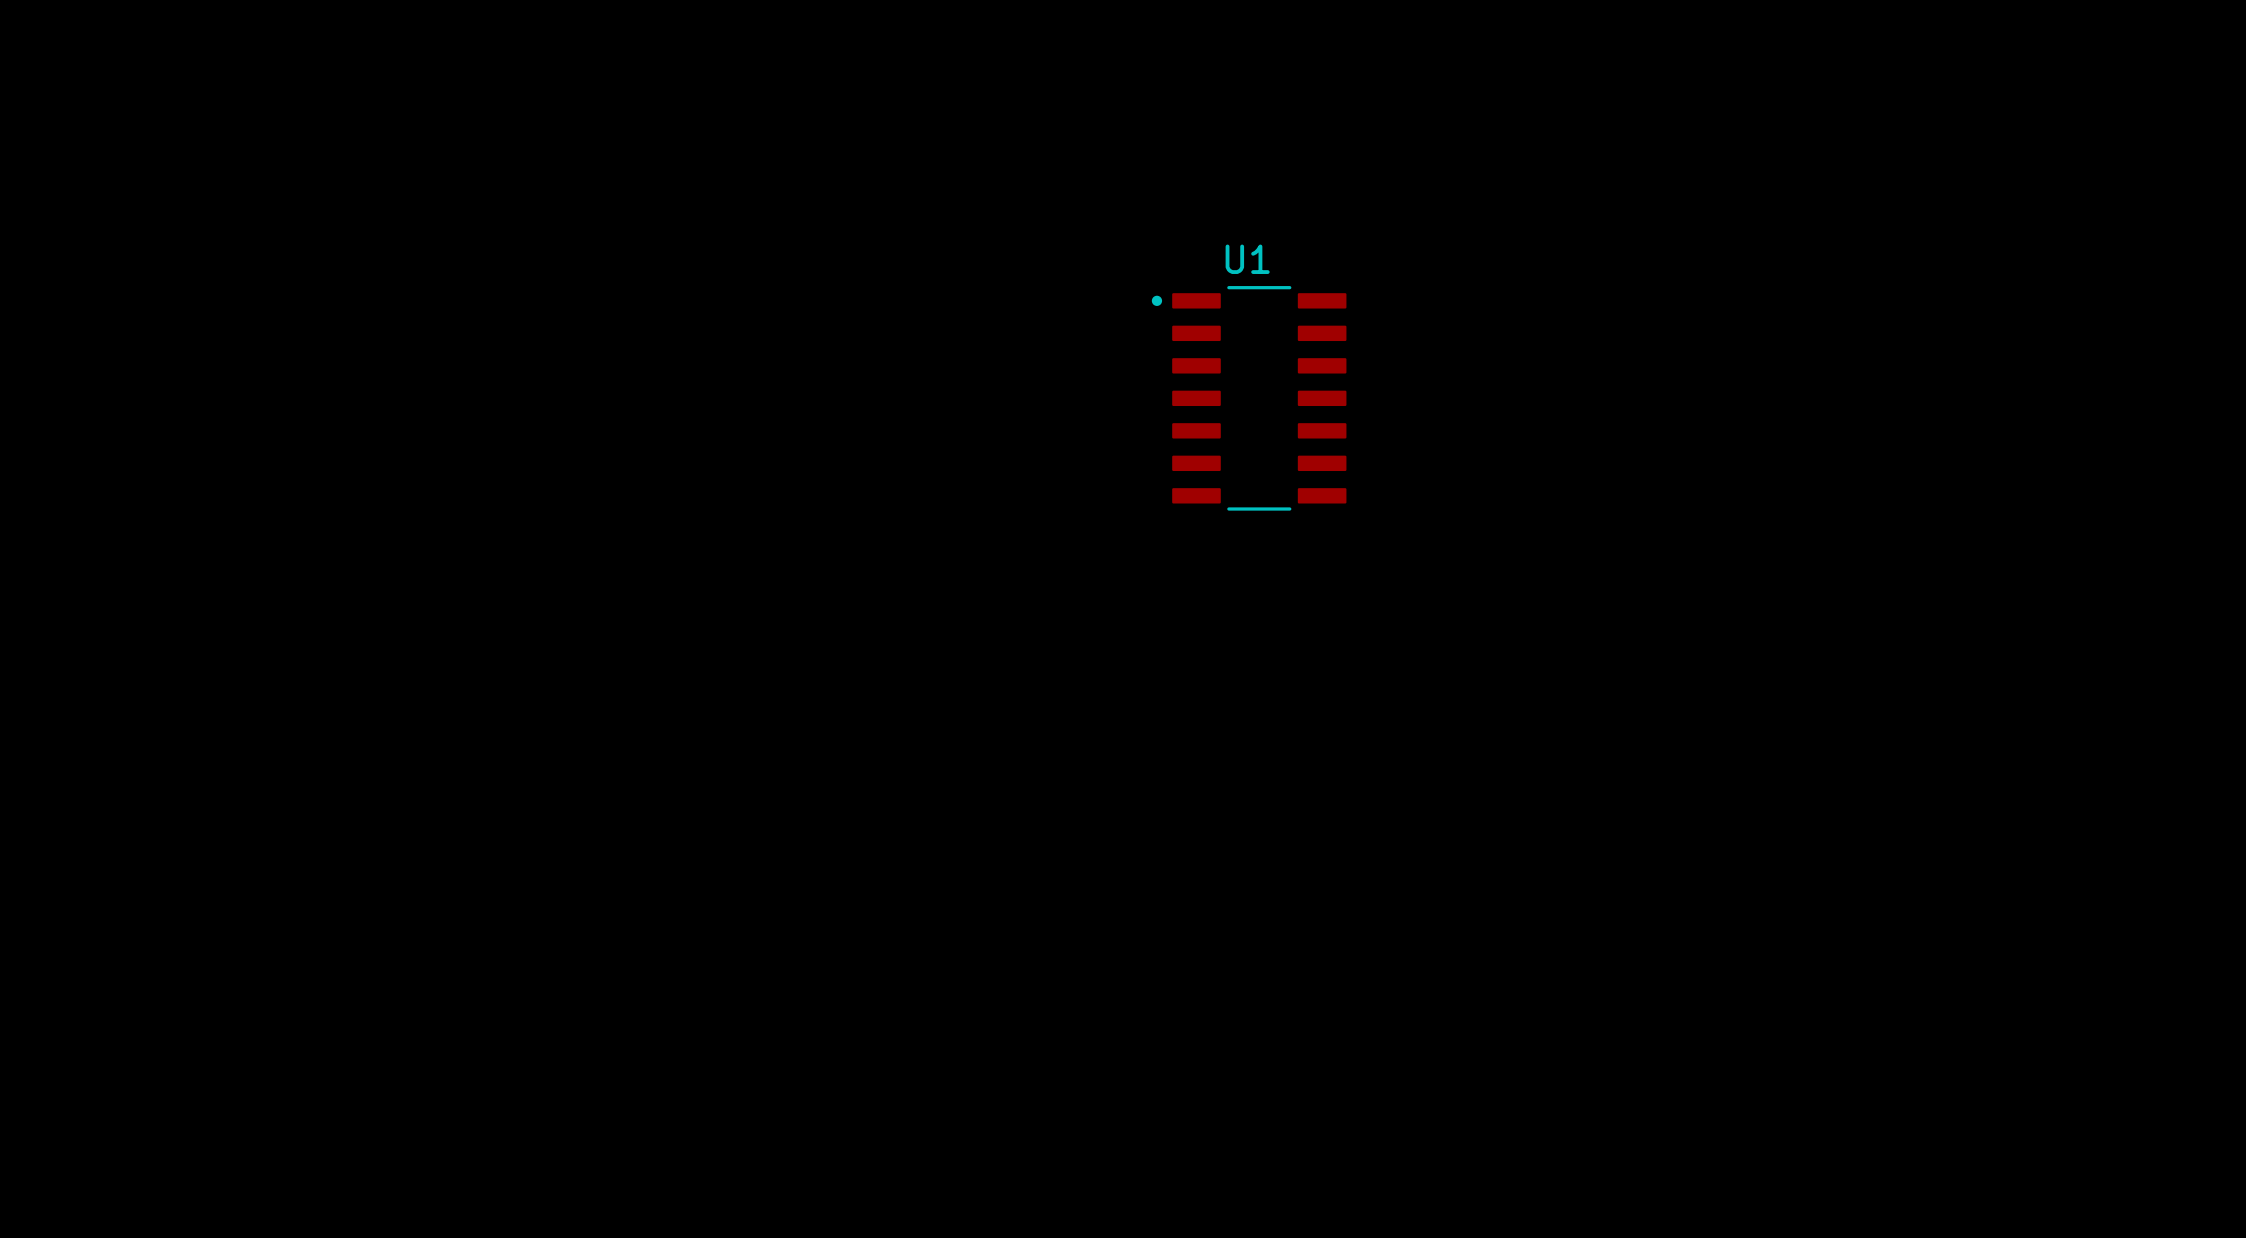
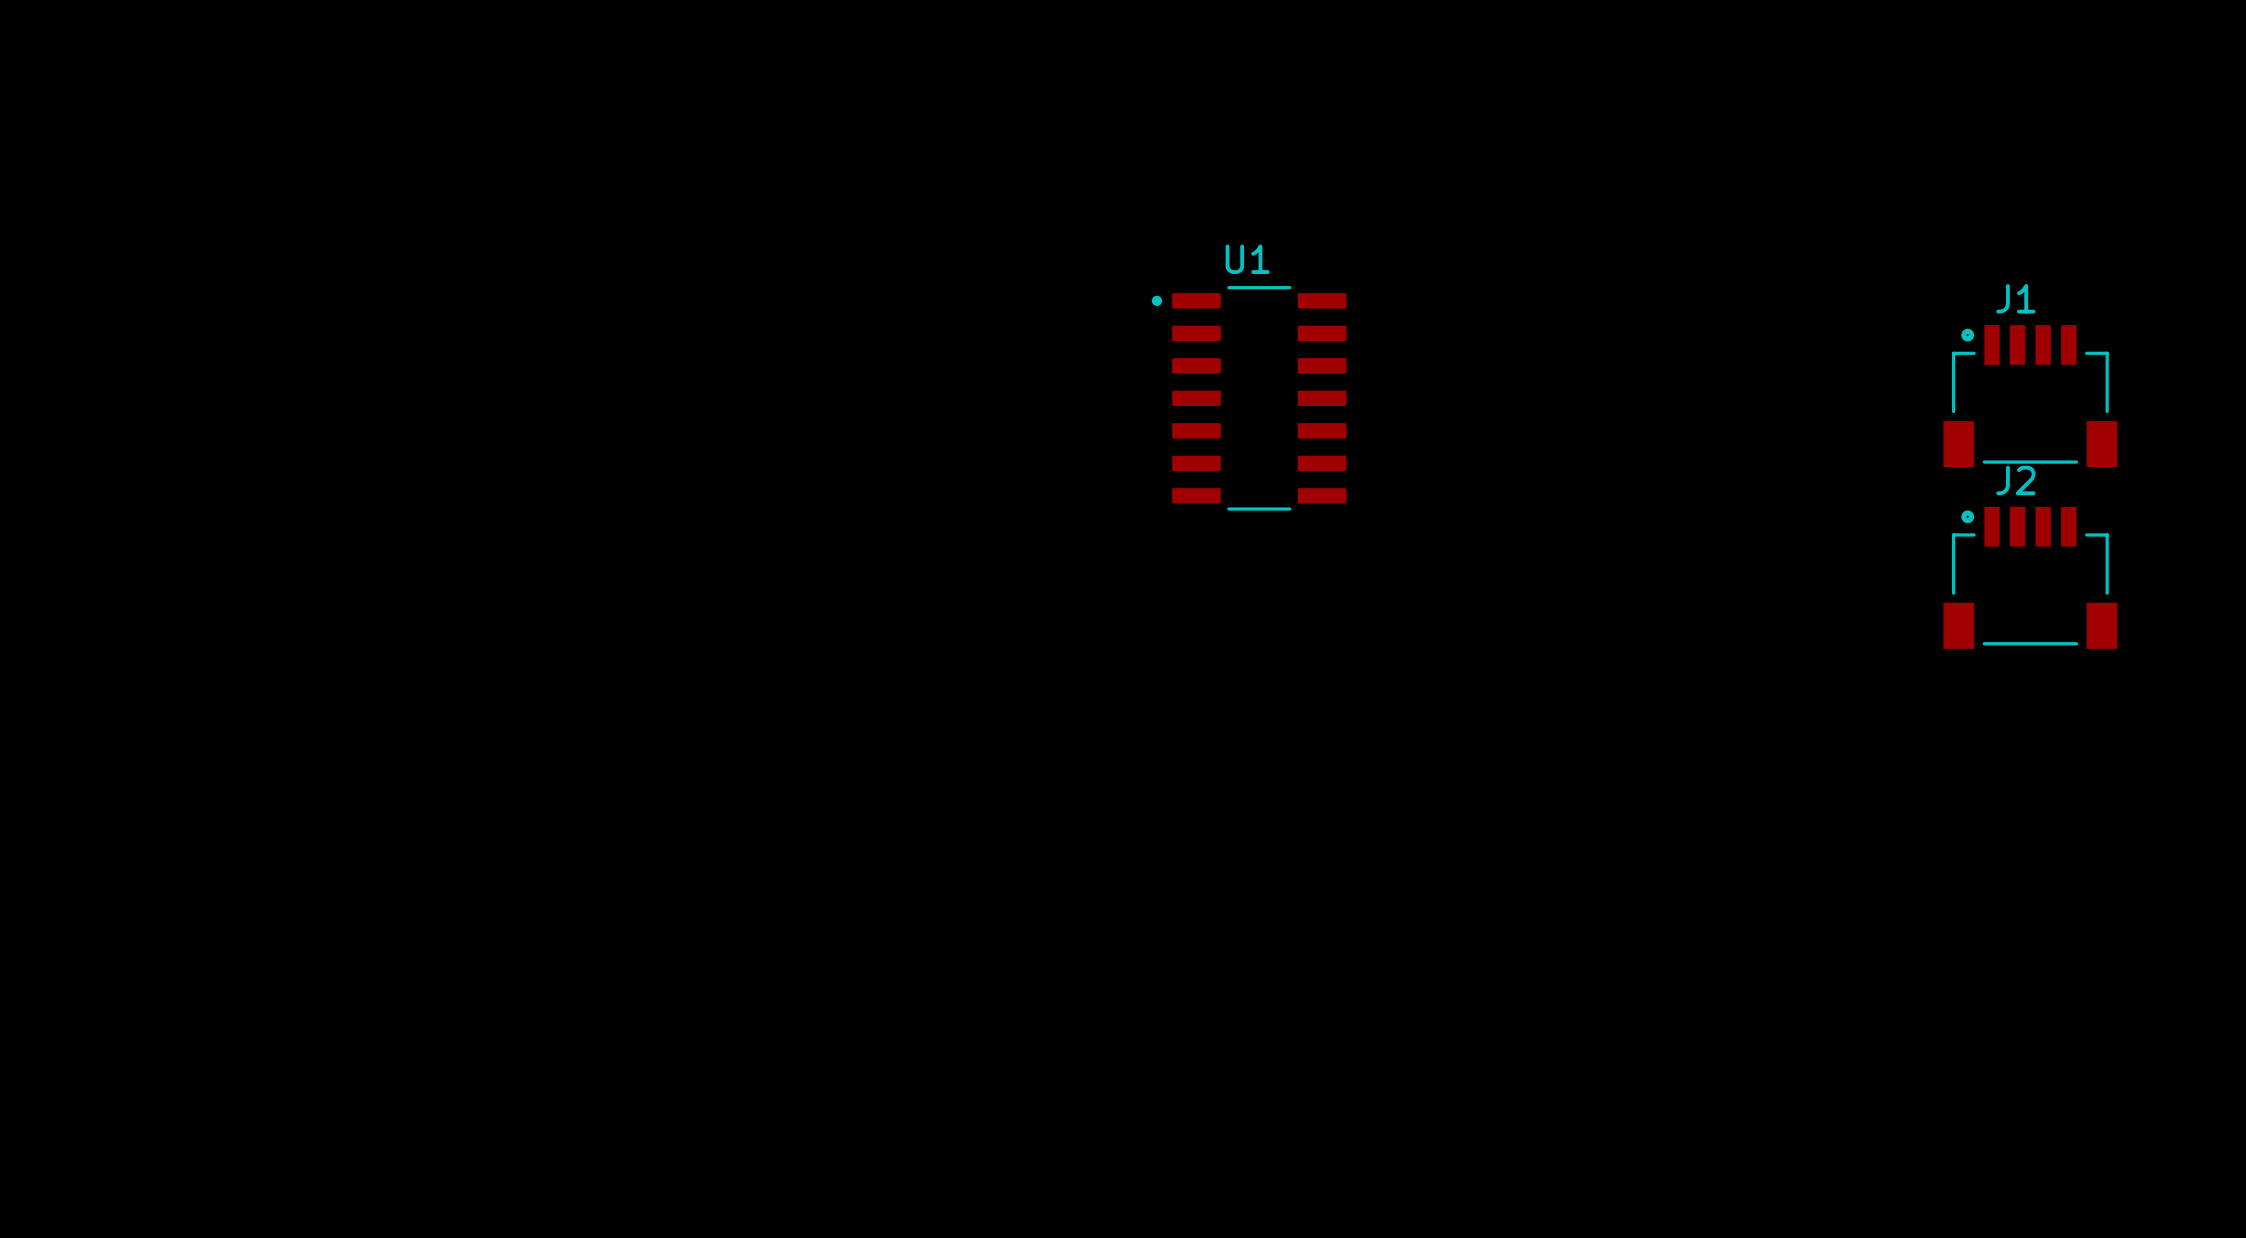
J1: none -> (2030, 396)
J2: none -> (2030, 577)

